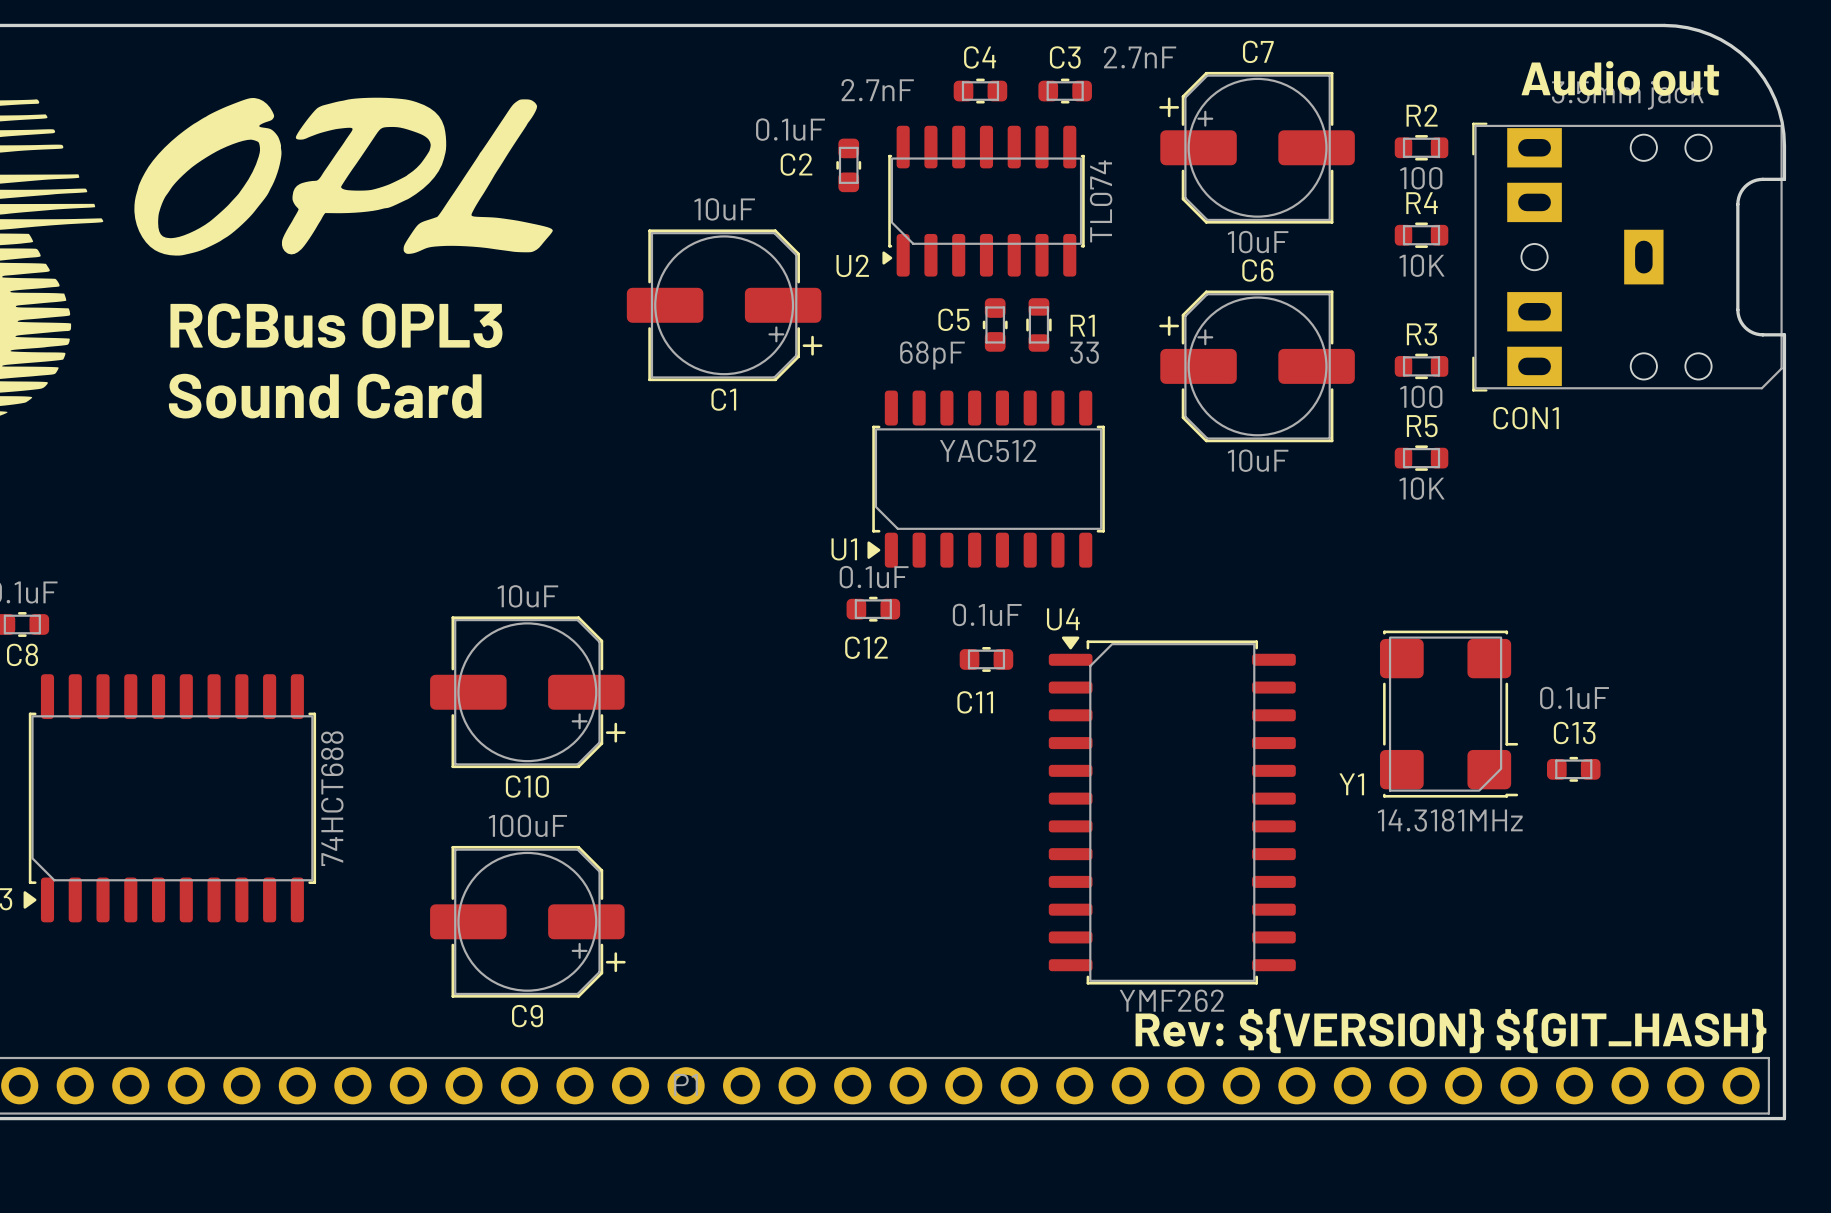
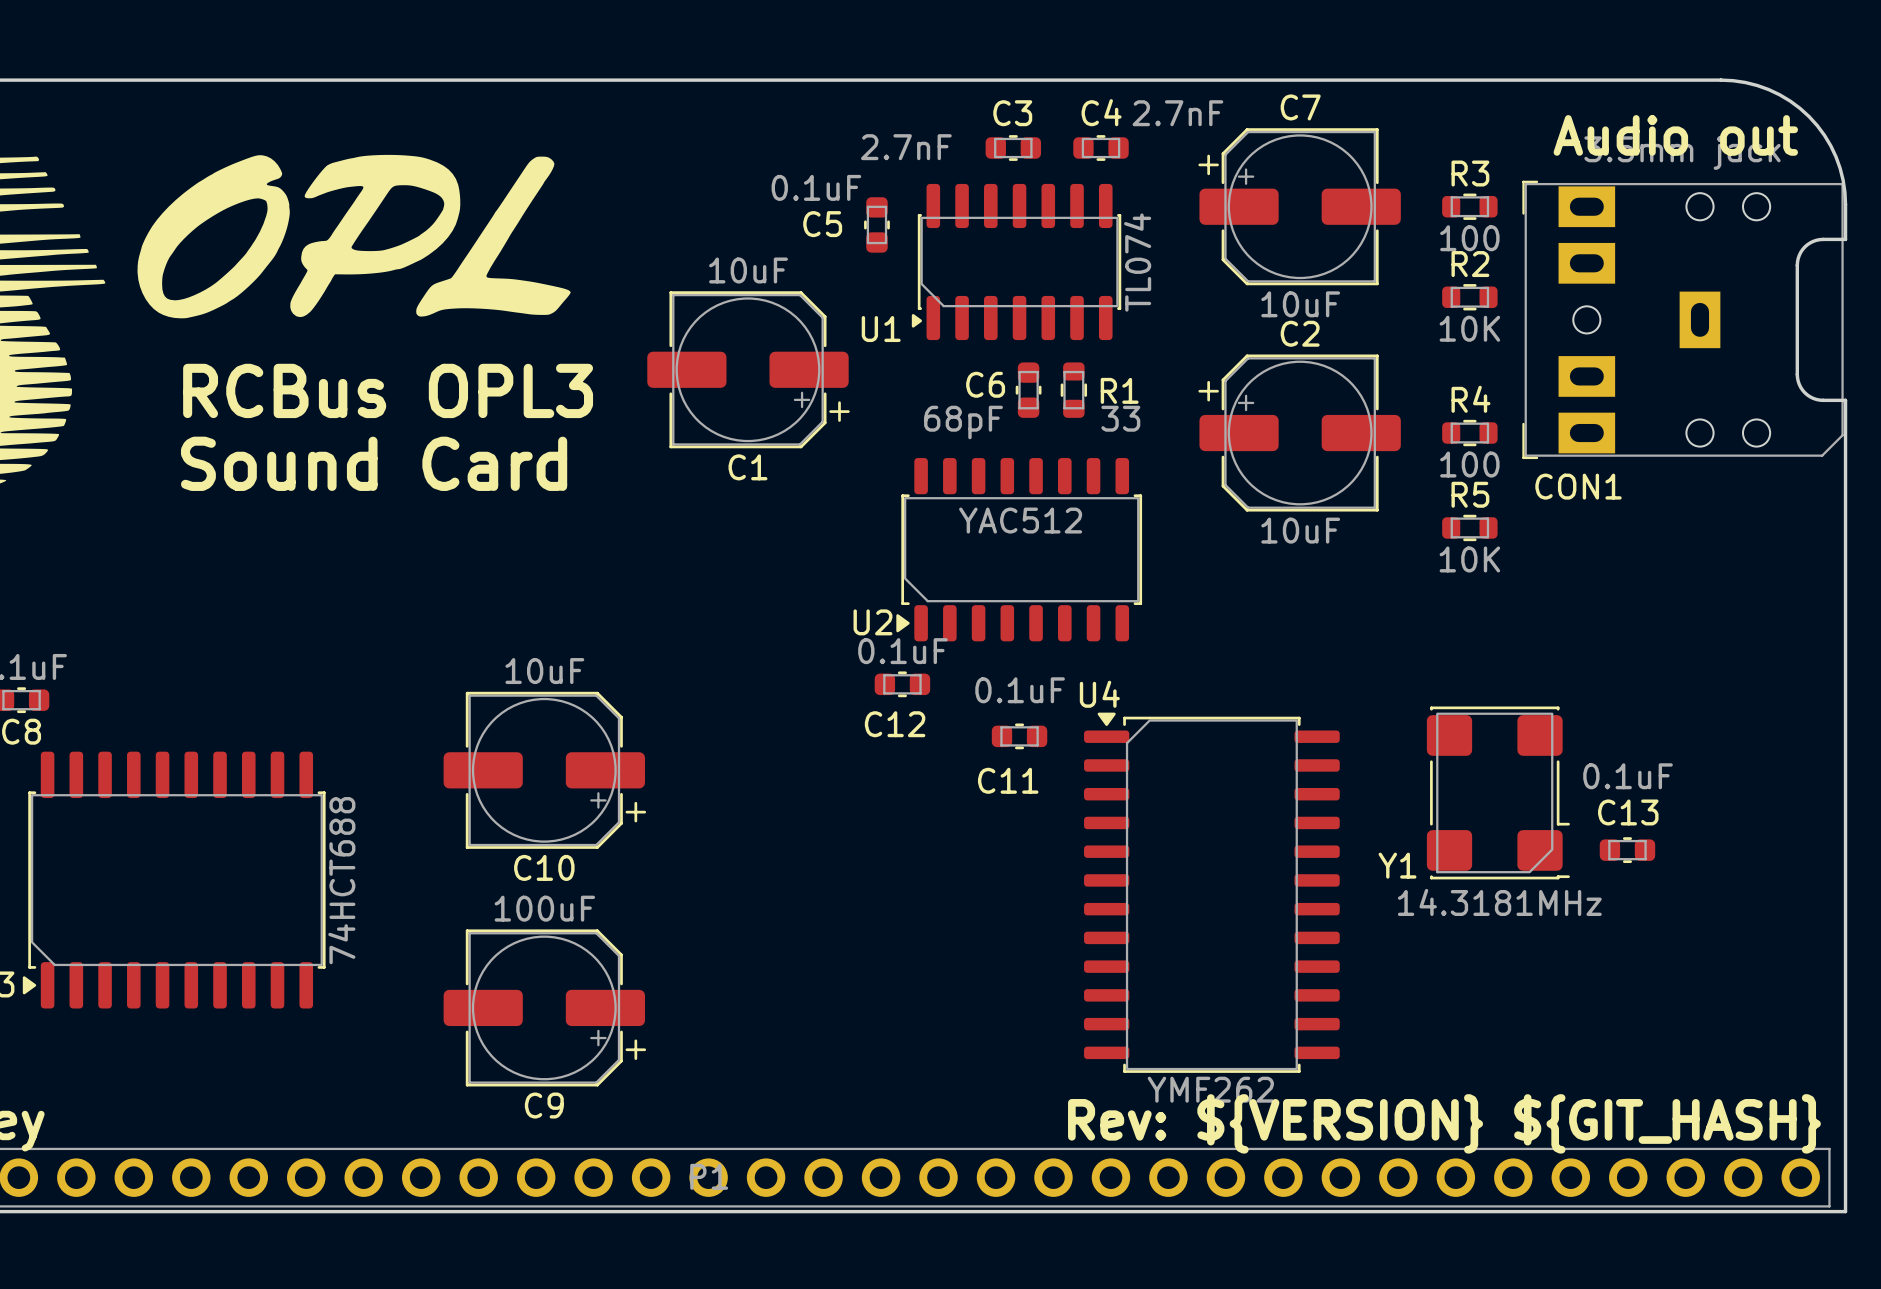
C4 name: C4 (980, 57) -> C3 (1012, 113)
C3 name: C3 (1065, 57) -> C4 (1101, 112)
R2 name: R2 (1422, 115) -> R3 (1470, 173)
C2 name: C2 (796, 164) -> C5 (822, 224)
R4 name: R4 (1422, 203) -> R2 (1470, 264)
U2 name: U2 (852, 265) -> U1 (881, 329)
C6 name: C6 (1257, 270) -> C2 (1300, 333)
C5 name: C5 (954, 319) -> C6 (985, 384)
R3 name: R3 (1421, 334) -> R4 (1470, 399)
U1 name: U1 (844, 549) -> U2 (872, 622)

